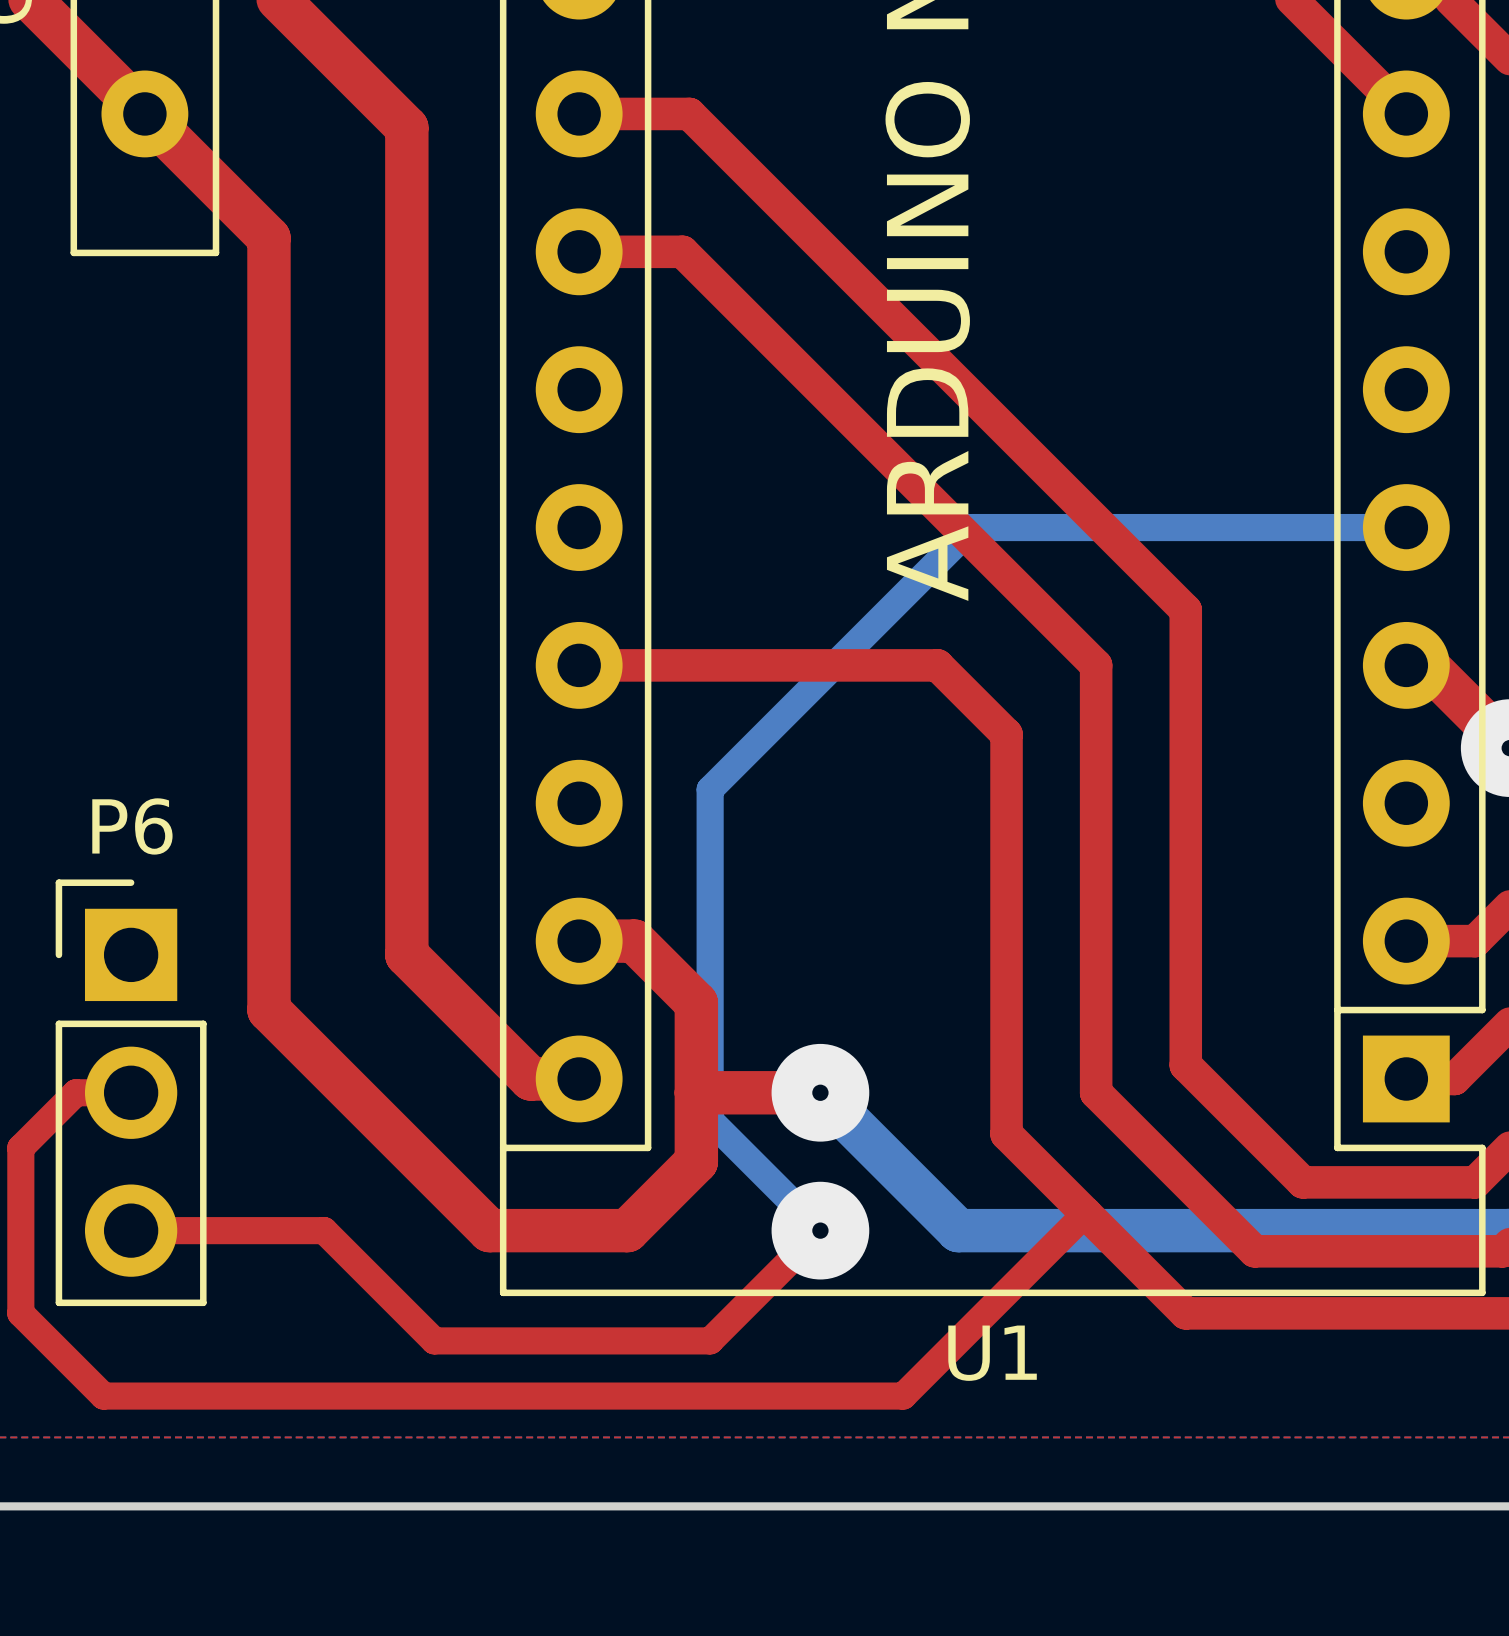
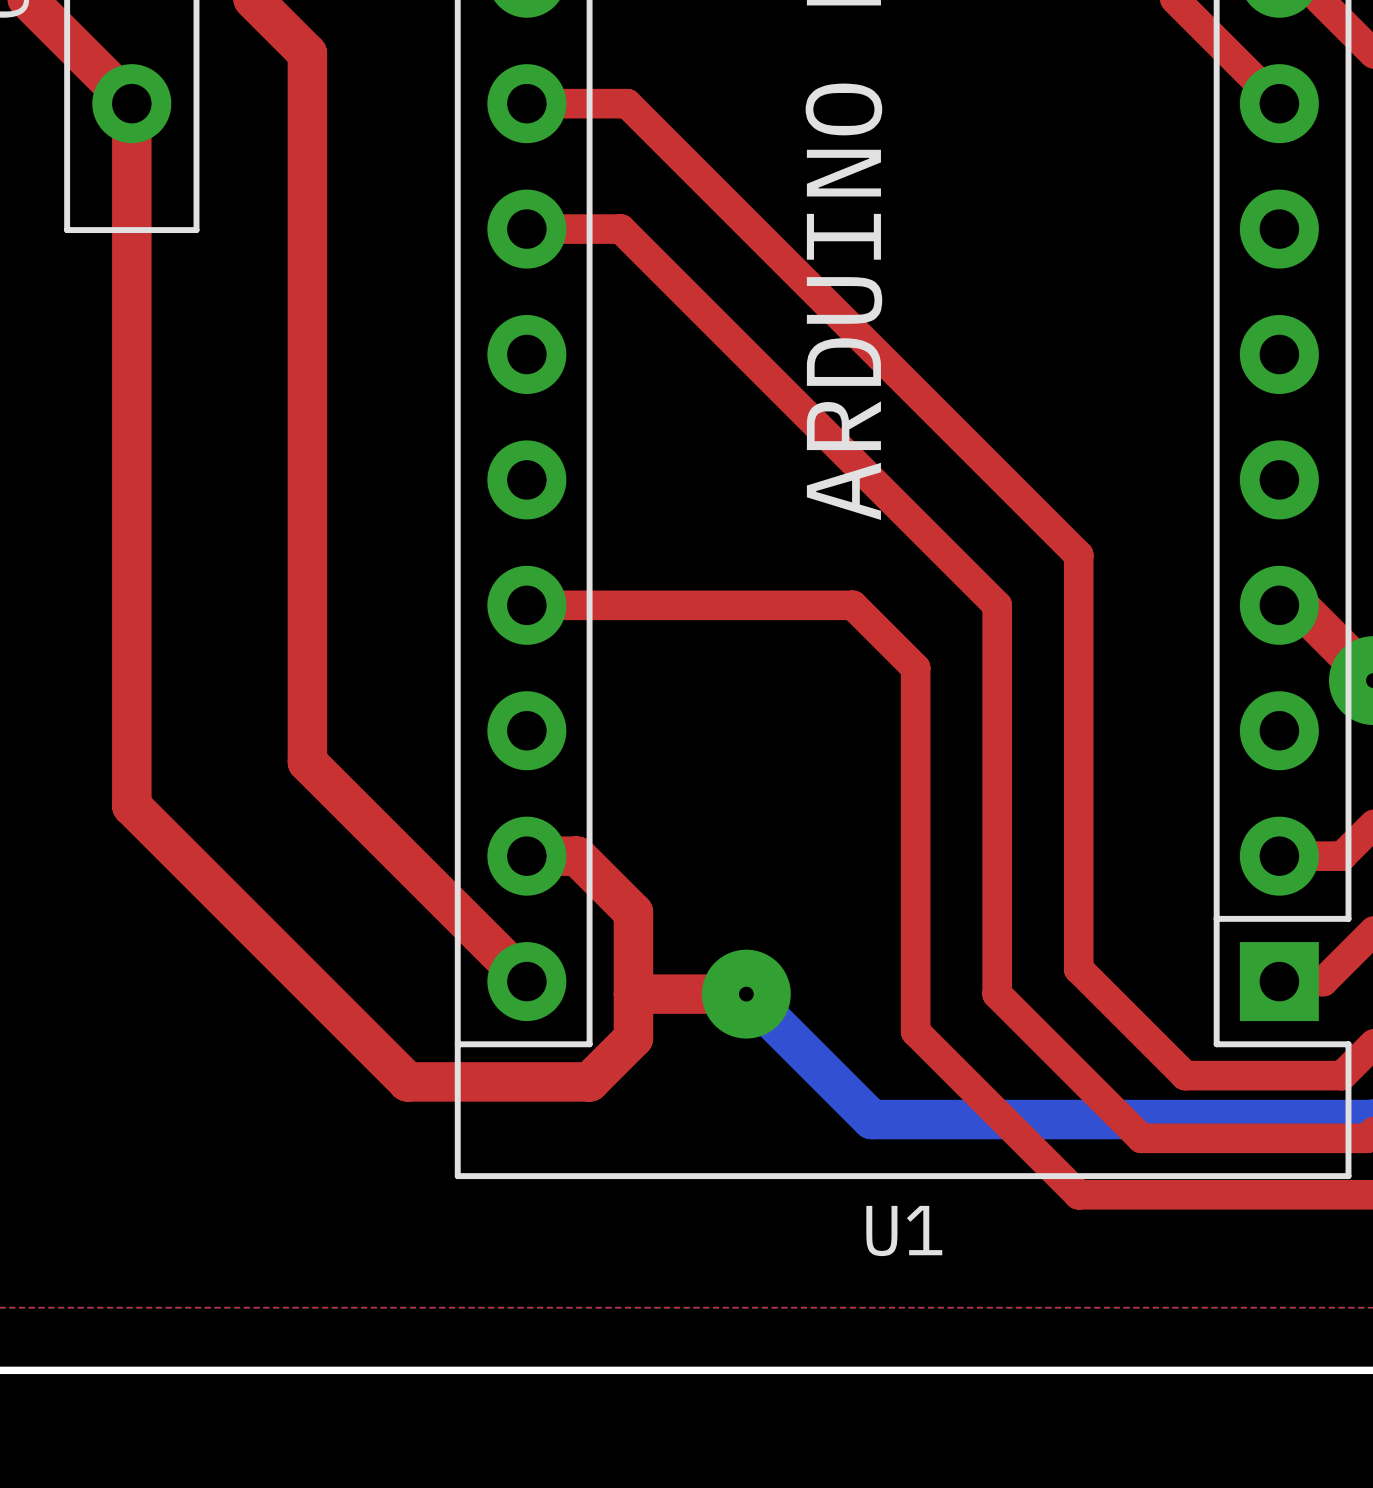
top track: (337, 58) (406, 127) (406, 954) (530, 1078) (579, 1078) -> (307, 53) (307, 762) (526, 981)
top track: (144, 113) (268, 238) (268, 1010) -> (131, 103) (131, 805) (244, 918)
bottom track: (1406, 527) (972, 527) (710, 789) (710, 1120) (820, 1230) -> none
top track: (131, 1092) (75, 1092) (20, 1147) (20, 1313) (103, 1396) (903, 1396) (1085, 1213) -> none
P6: (131, 1092) -> none
top track: (696, 1141) (696, 1161) (627, 1230) (489, 1230) (448, 1189) -> (633, 1038) (589, 1081) (407, 1081)
top track: (131, 1230) (324, 1230) (434, 1340) (710, 1340) (820, 1230) -> none
via: (820, 1230) -> none

